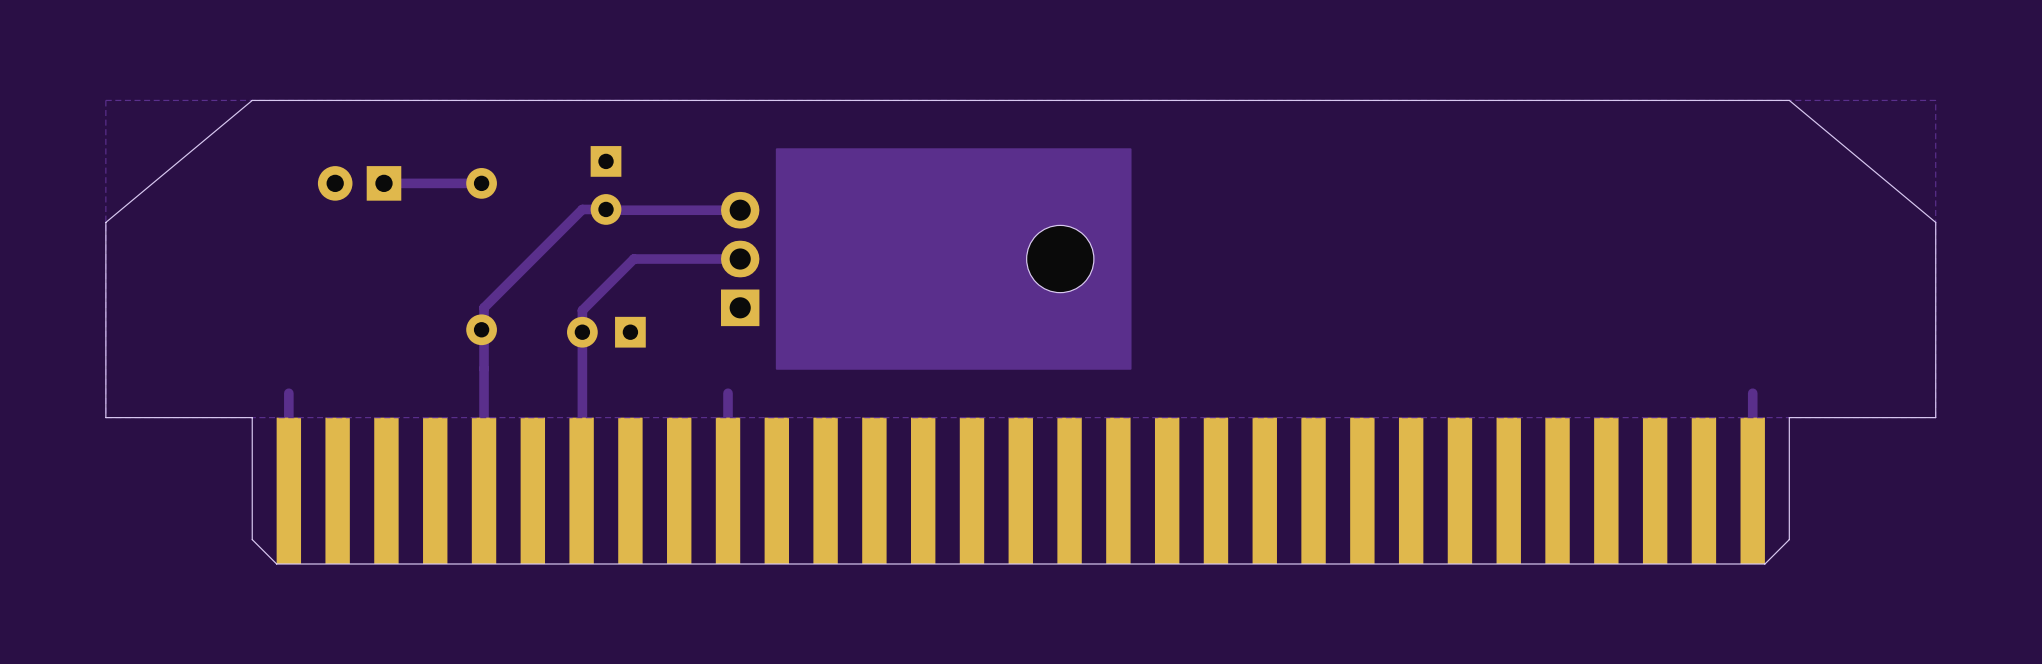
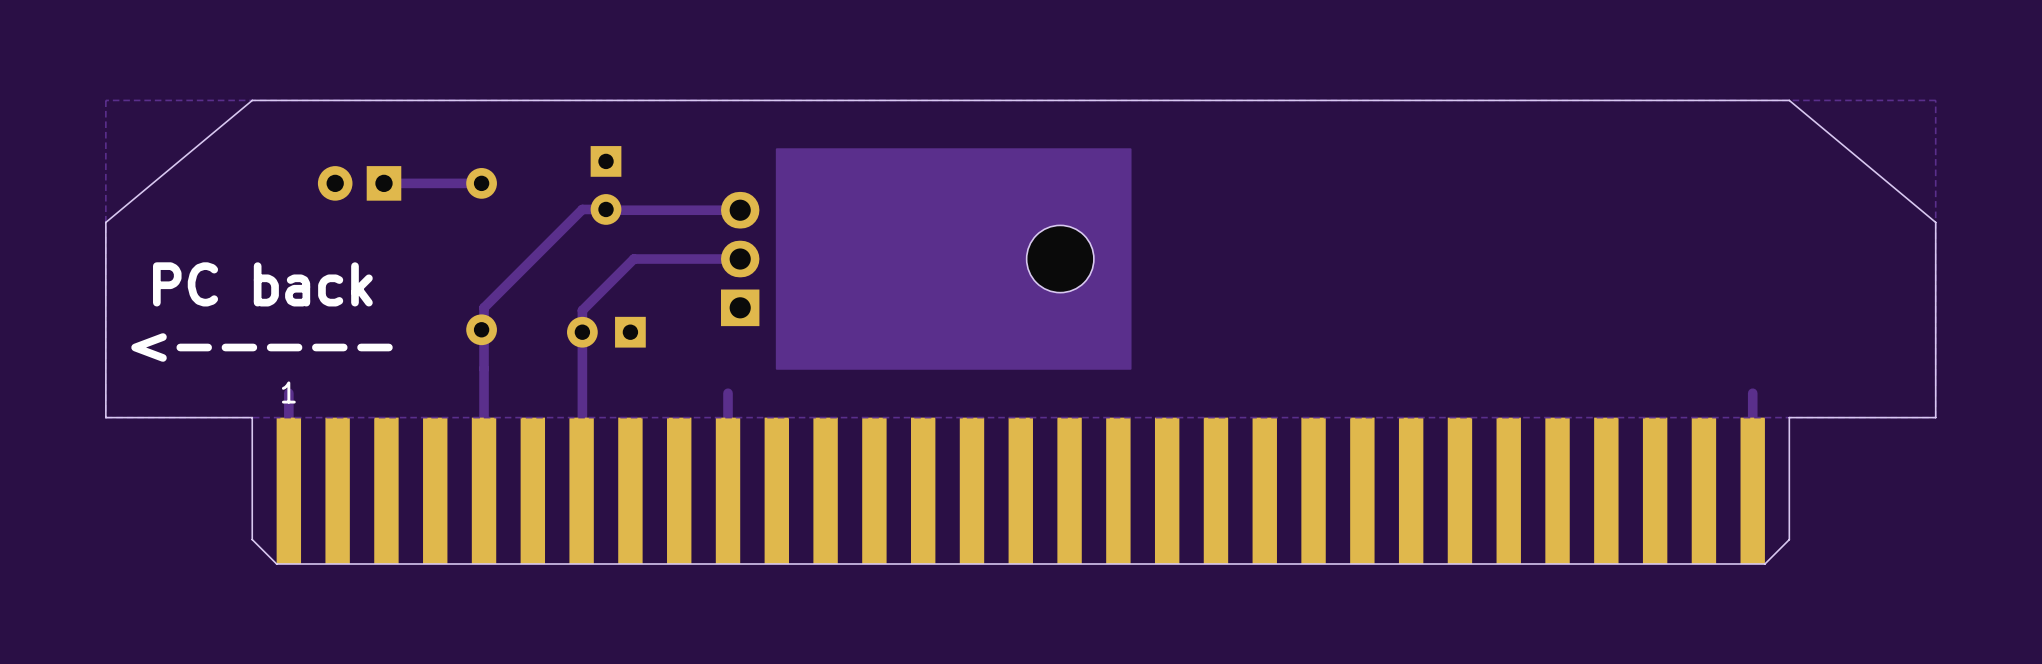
text: none -> PC back (262, 284)
text: none -> <----- (262, 347)
text: none -> 1 (288, 392)

